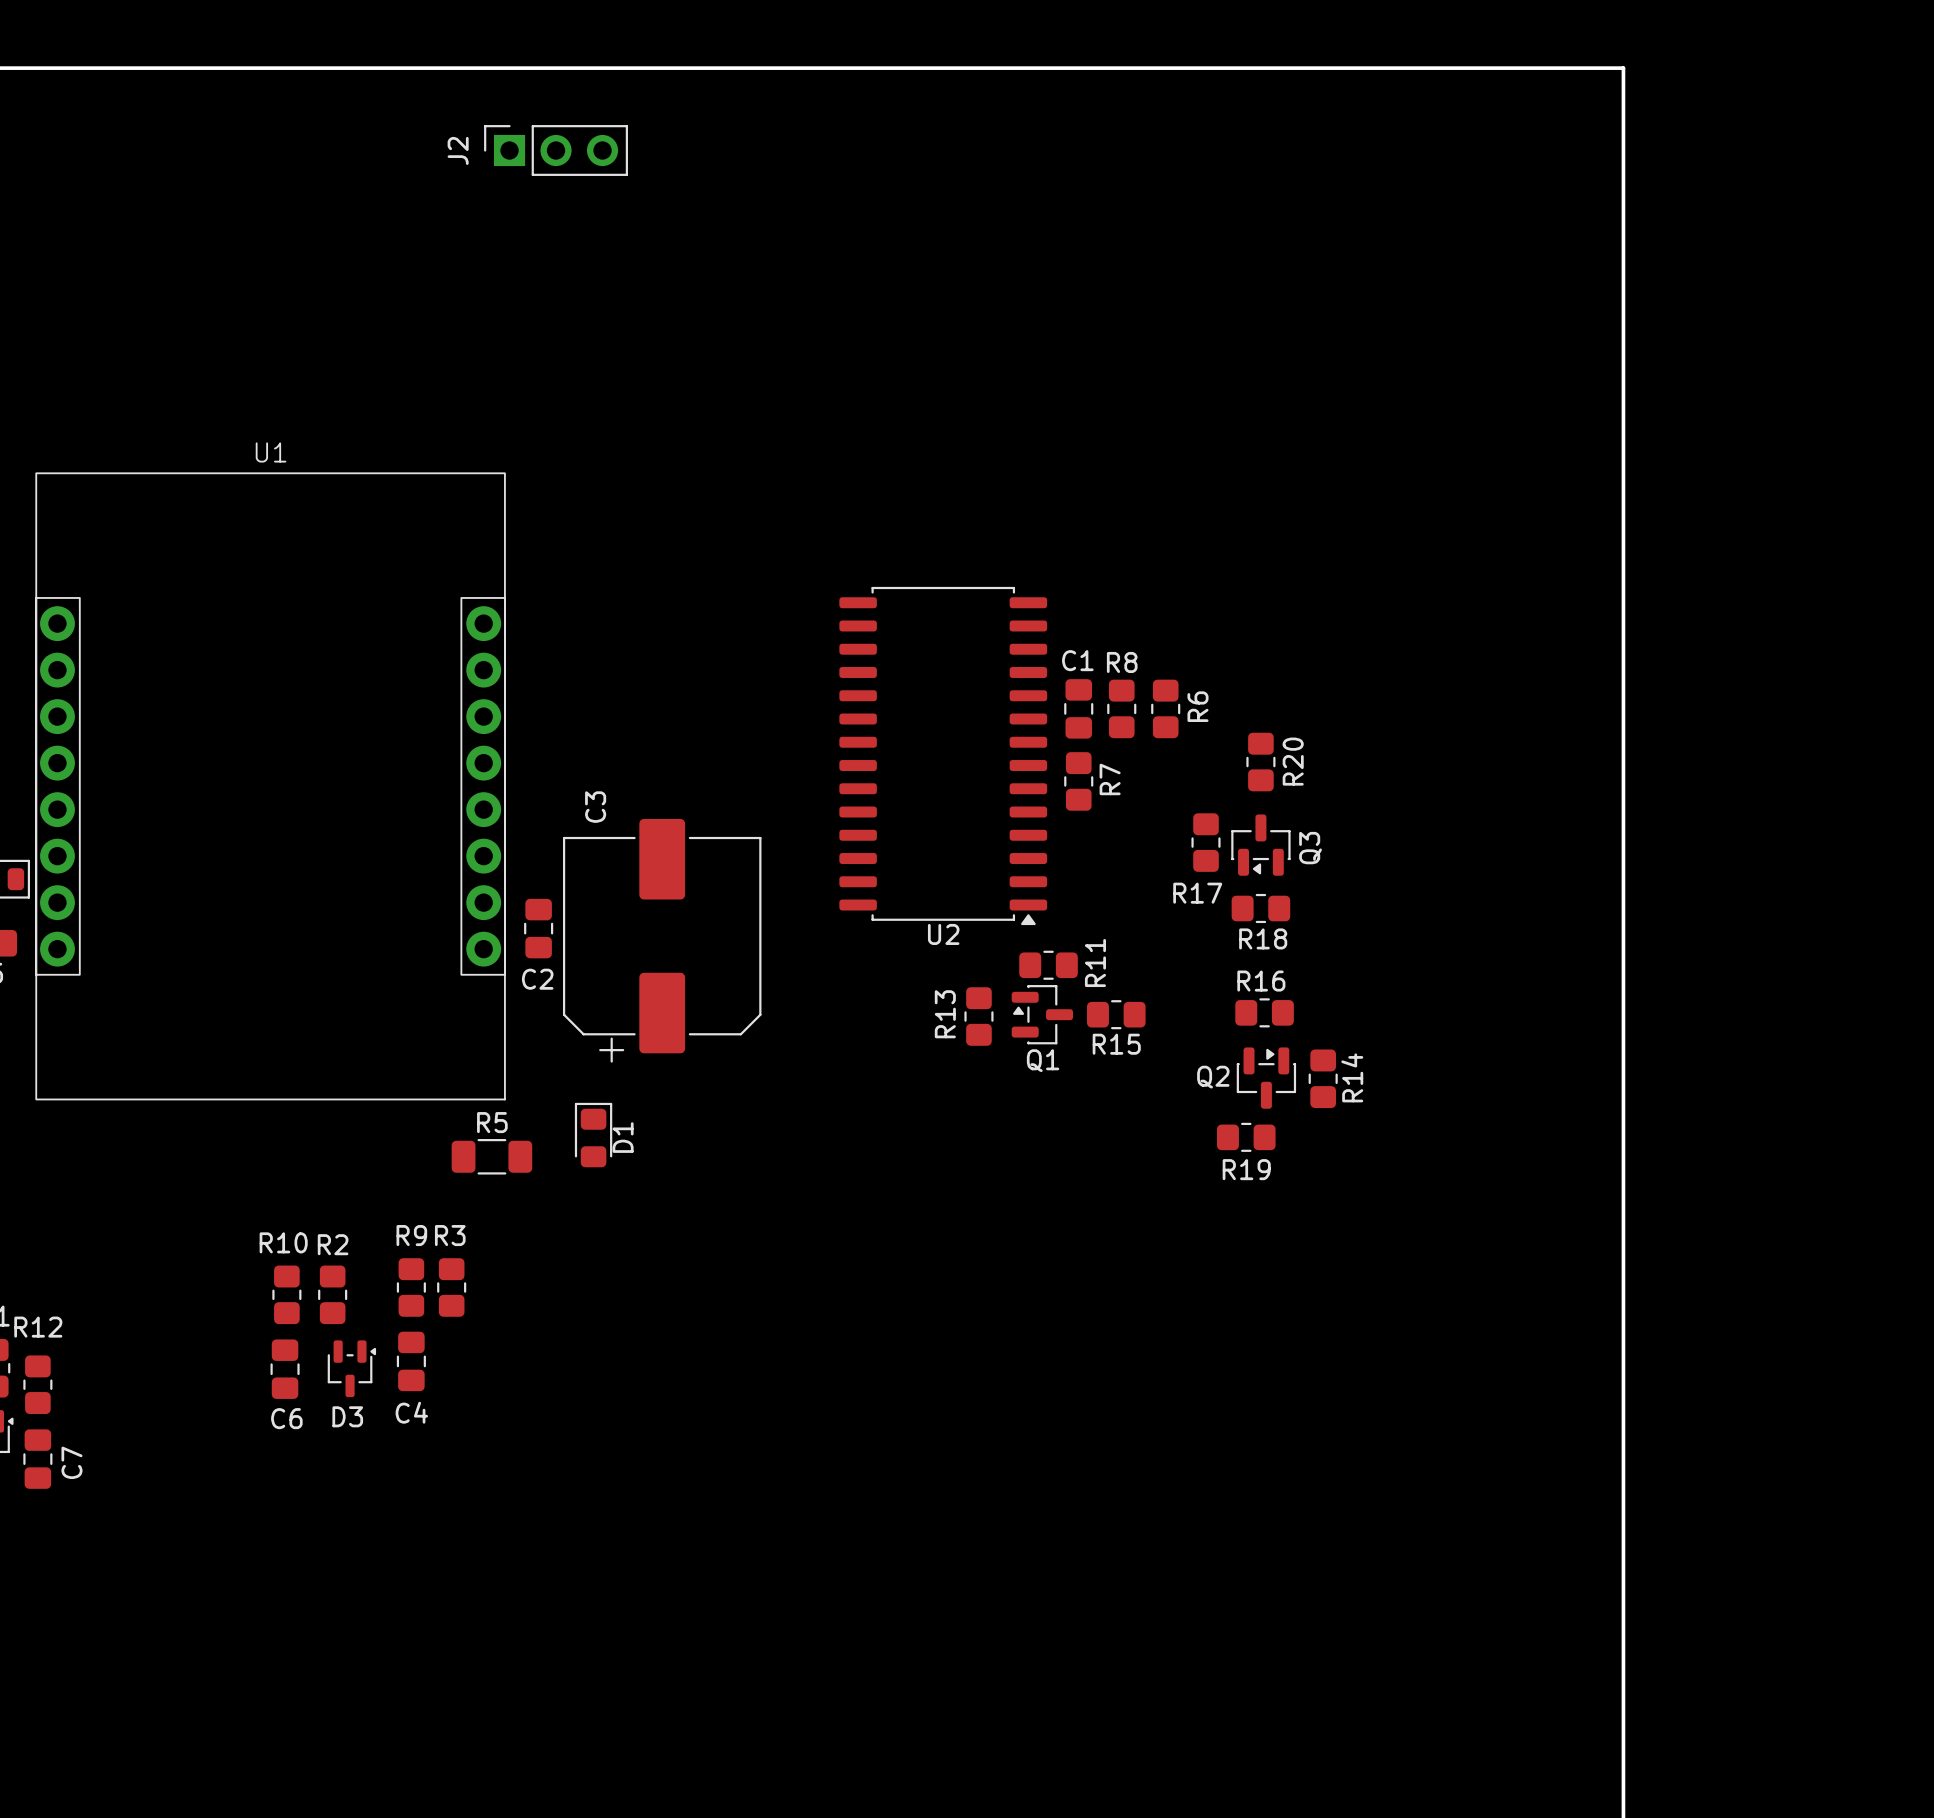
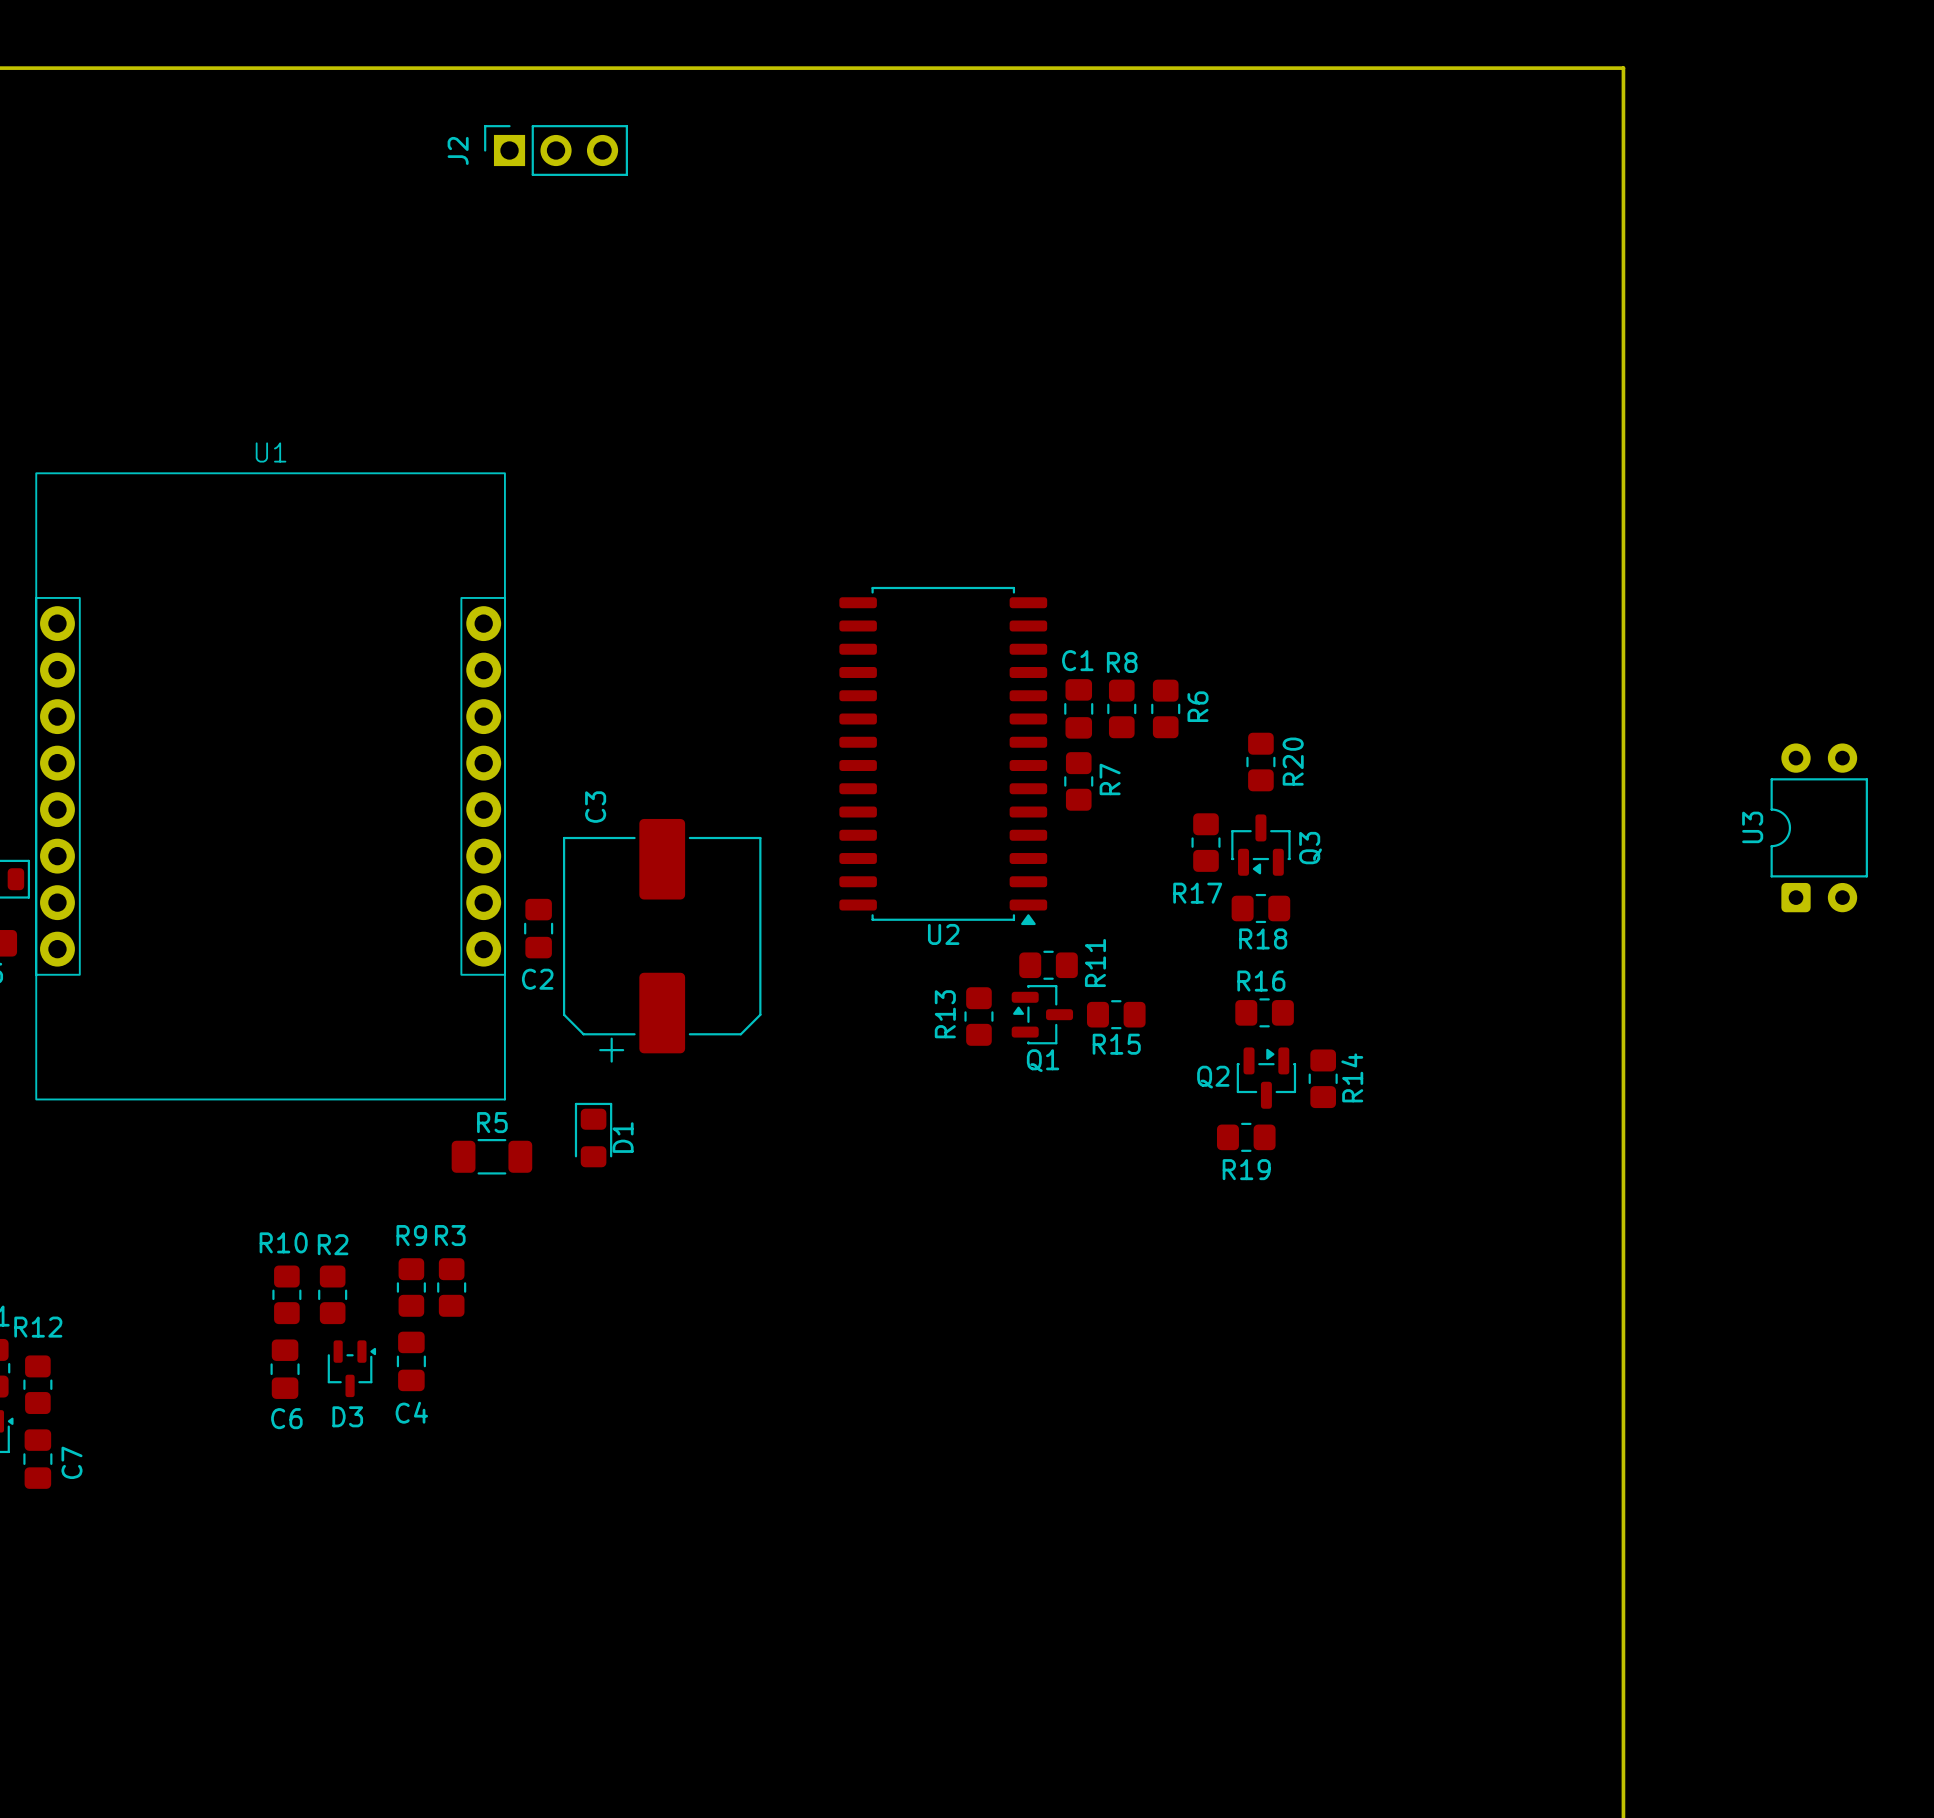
U3: none -> (1819, 827)

